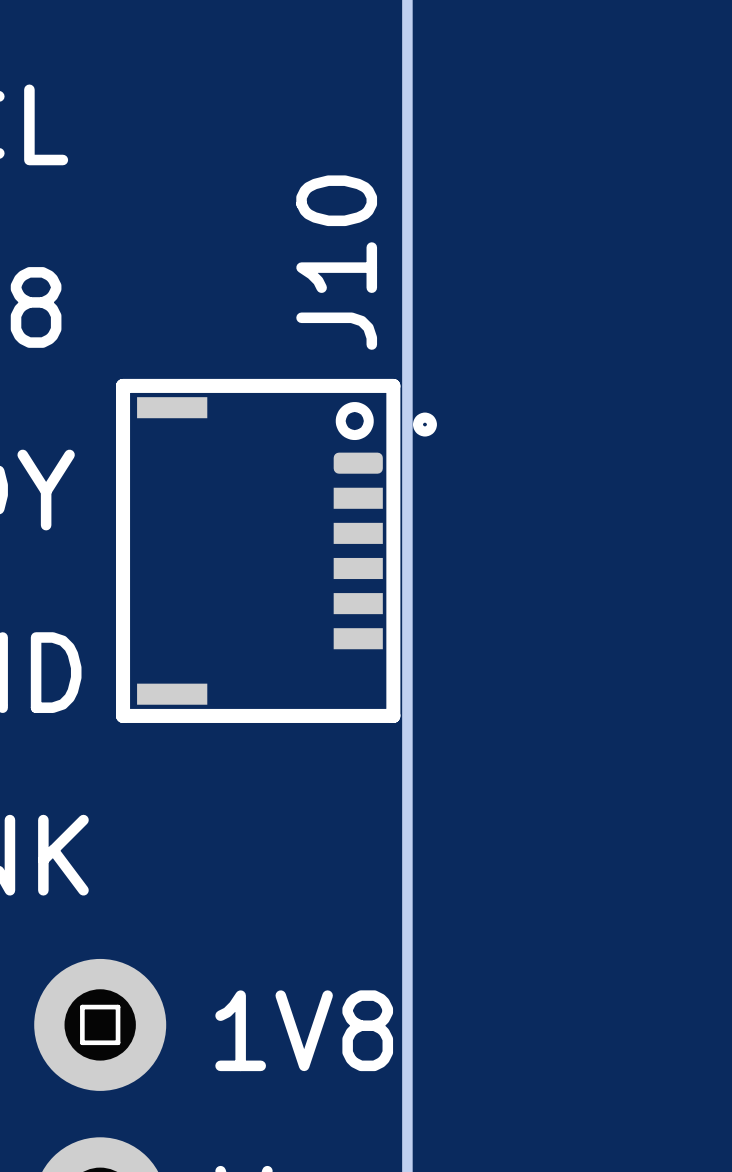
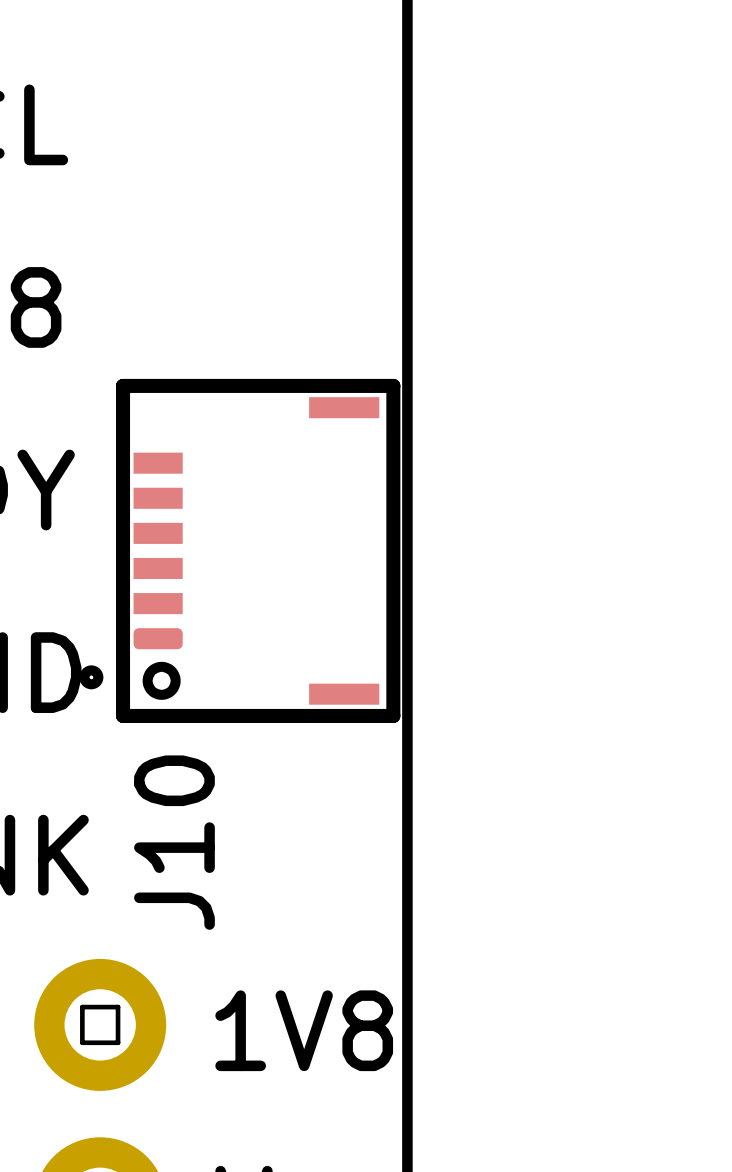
J10 rotation: 0° (276, 550) -> 180° (239, 550)

